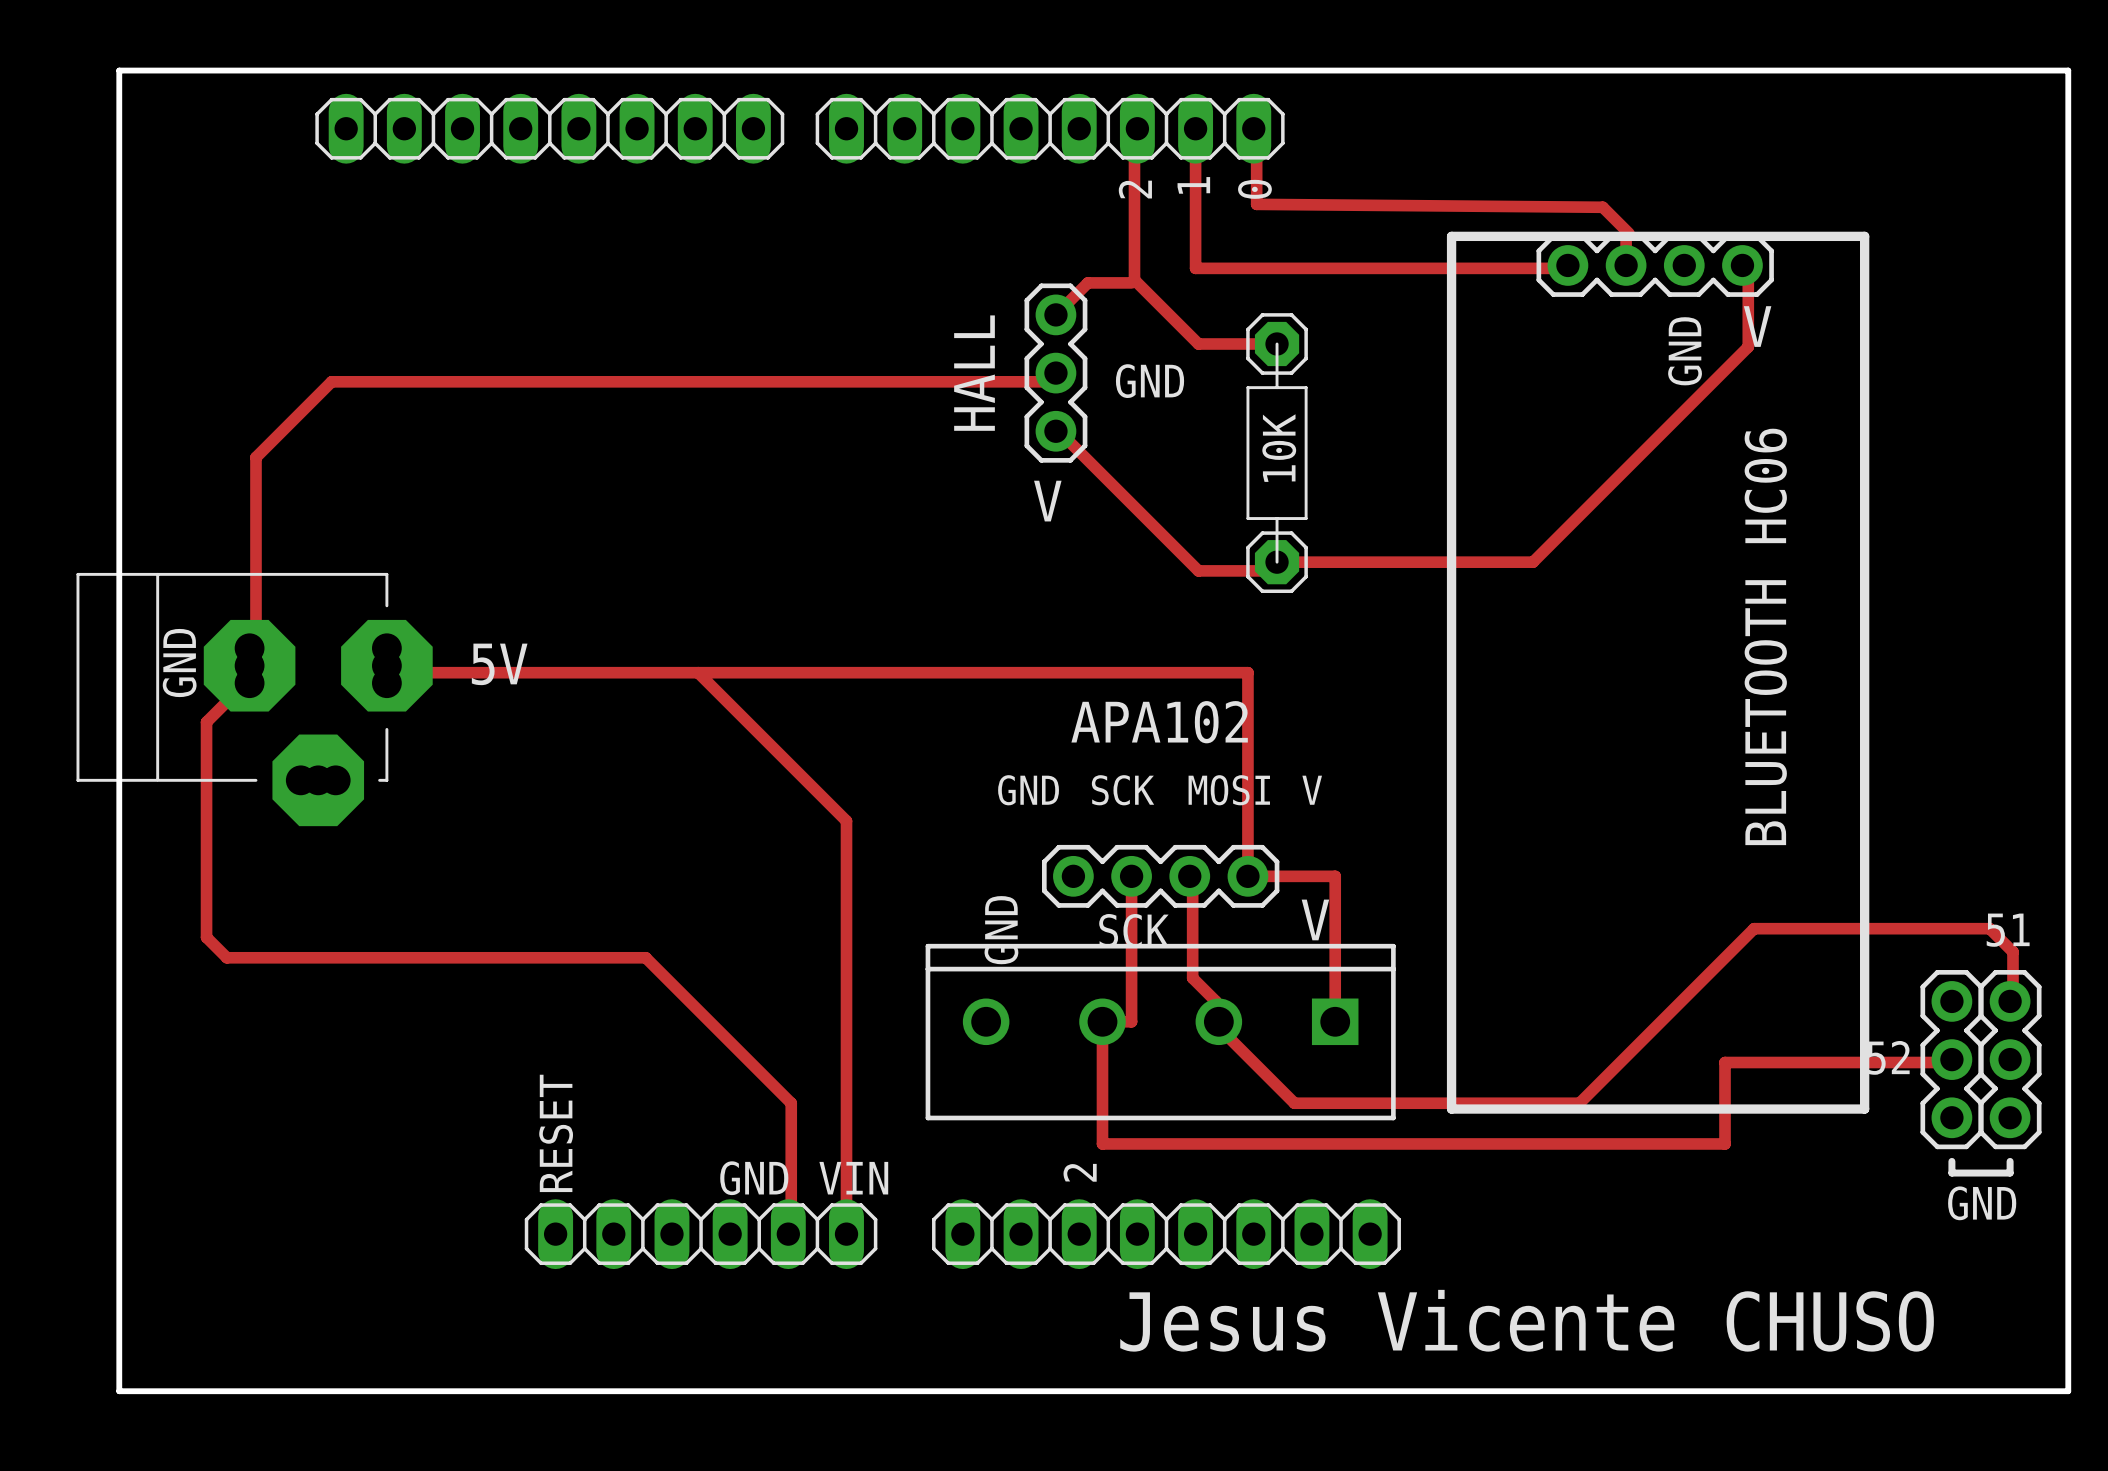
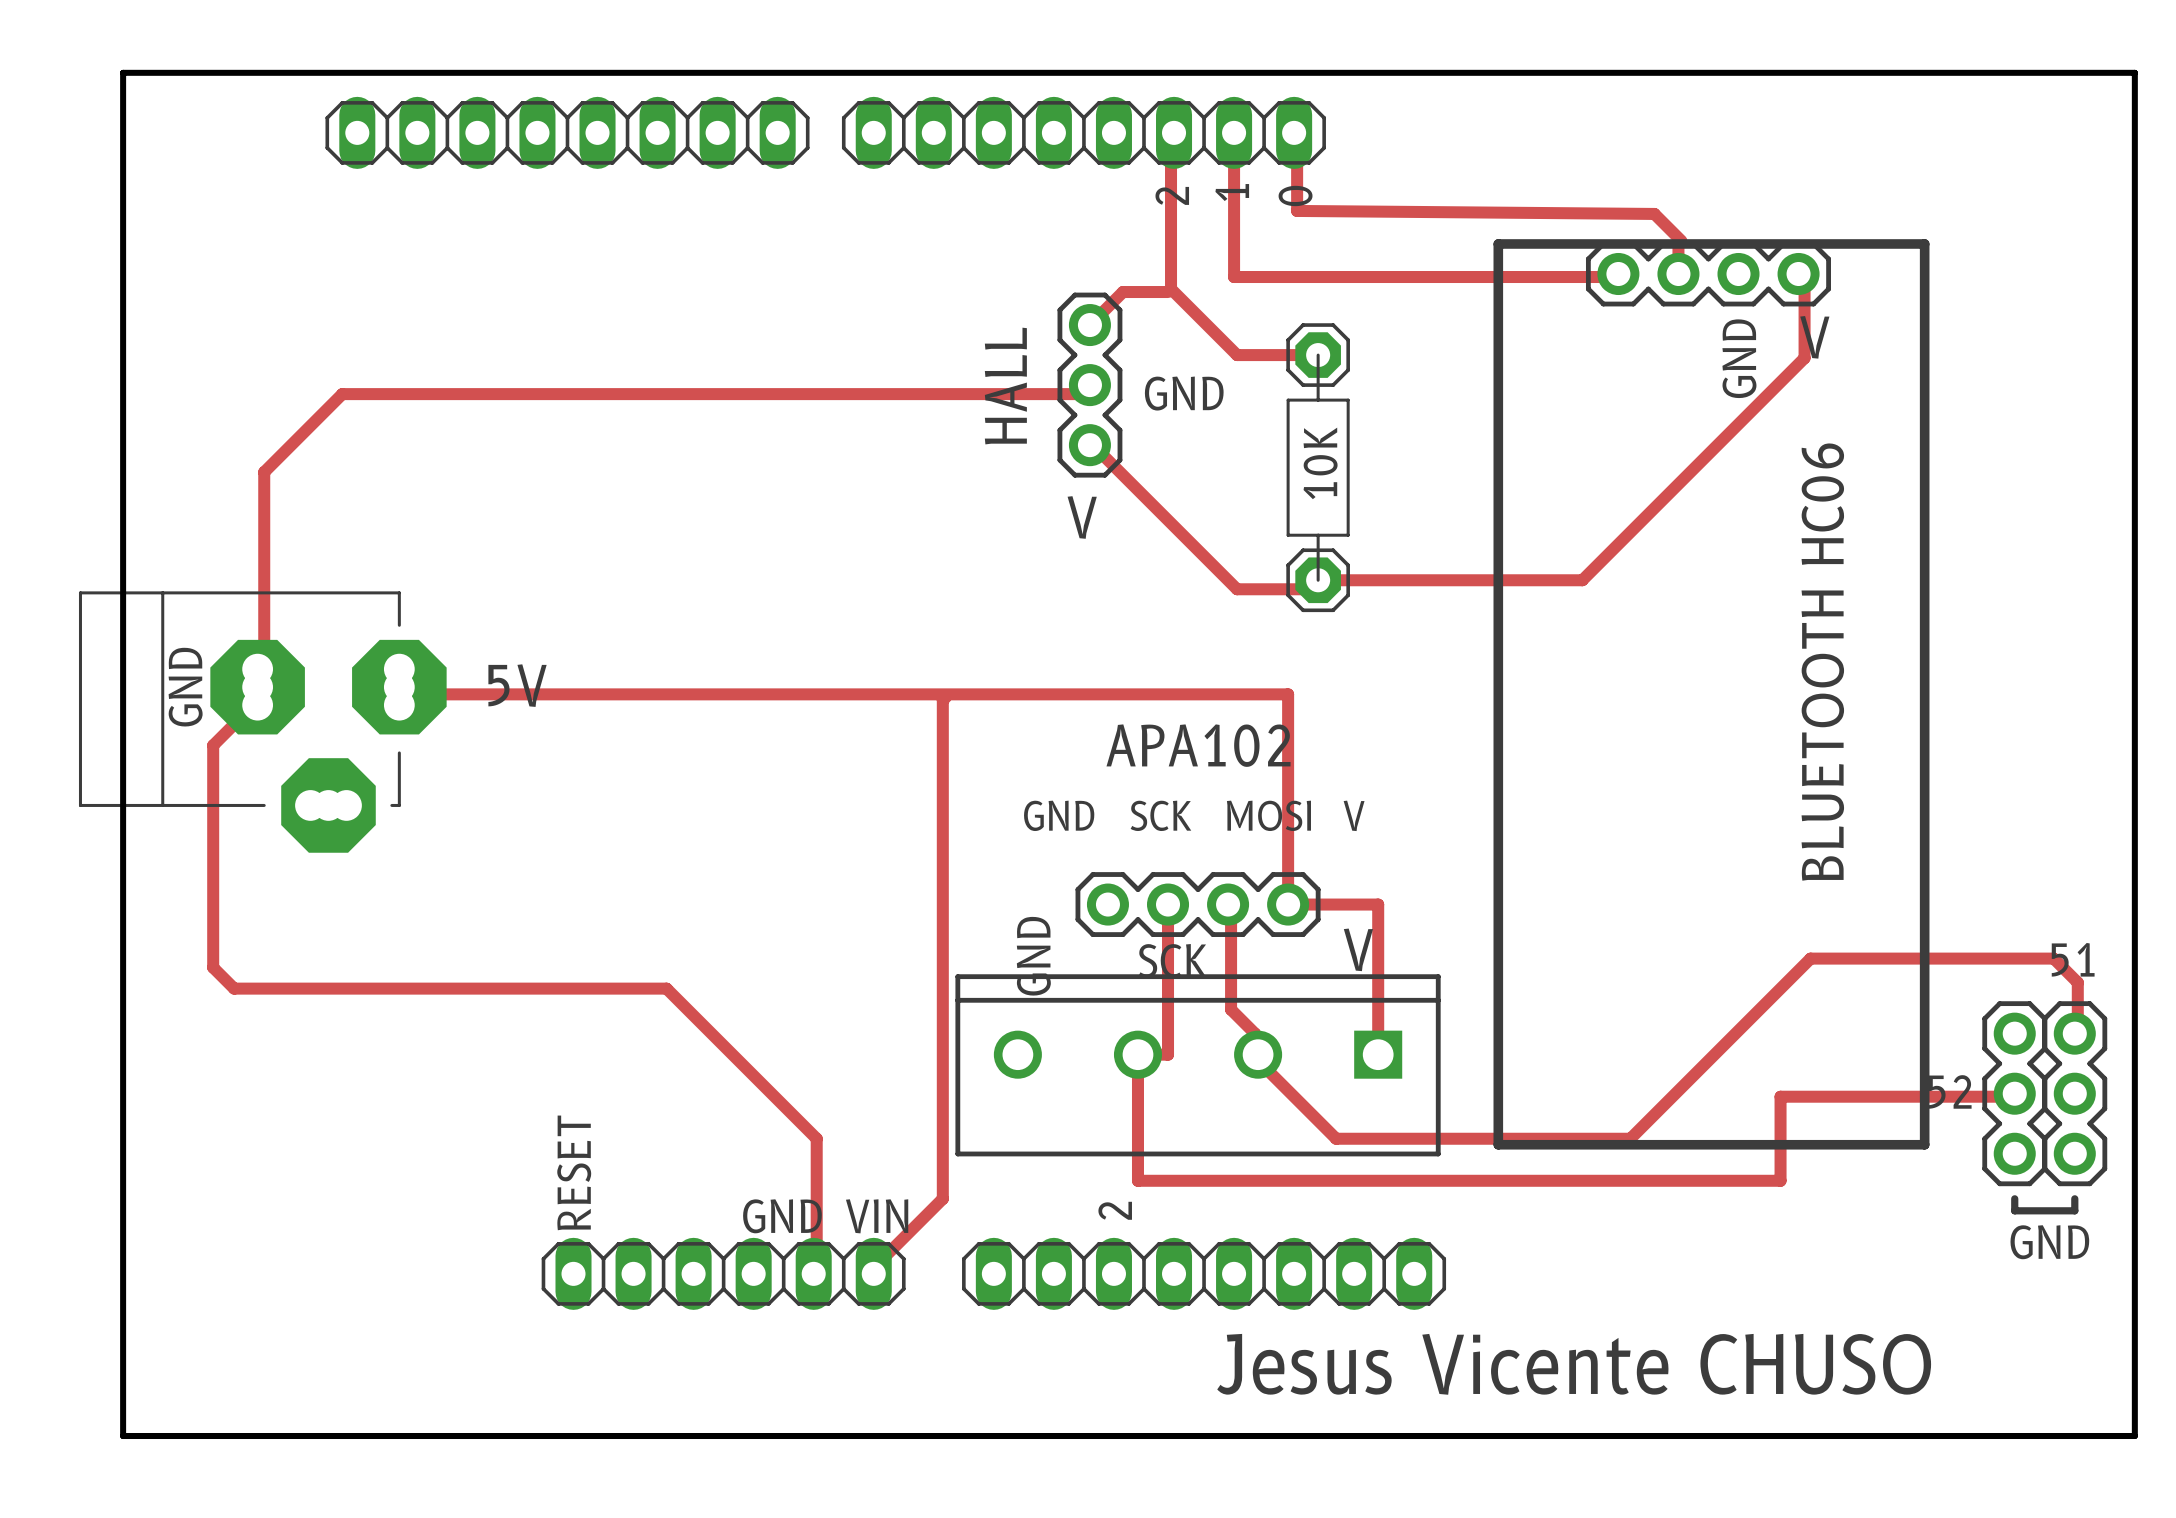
track: (698, 672) (846, 821) (846, 1231) (849, 1231) -> none
track: none -> (945, 697) (942, 700) (942, 1198) (873, 1267) (876, 1273)

